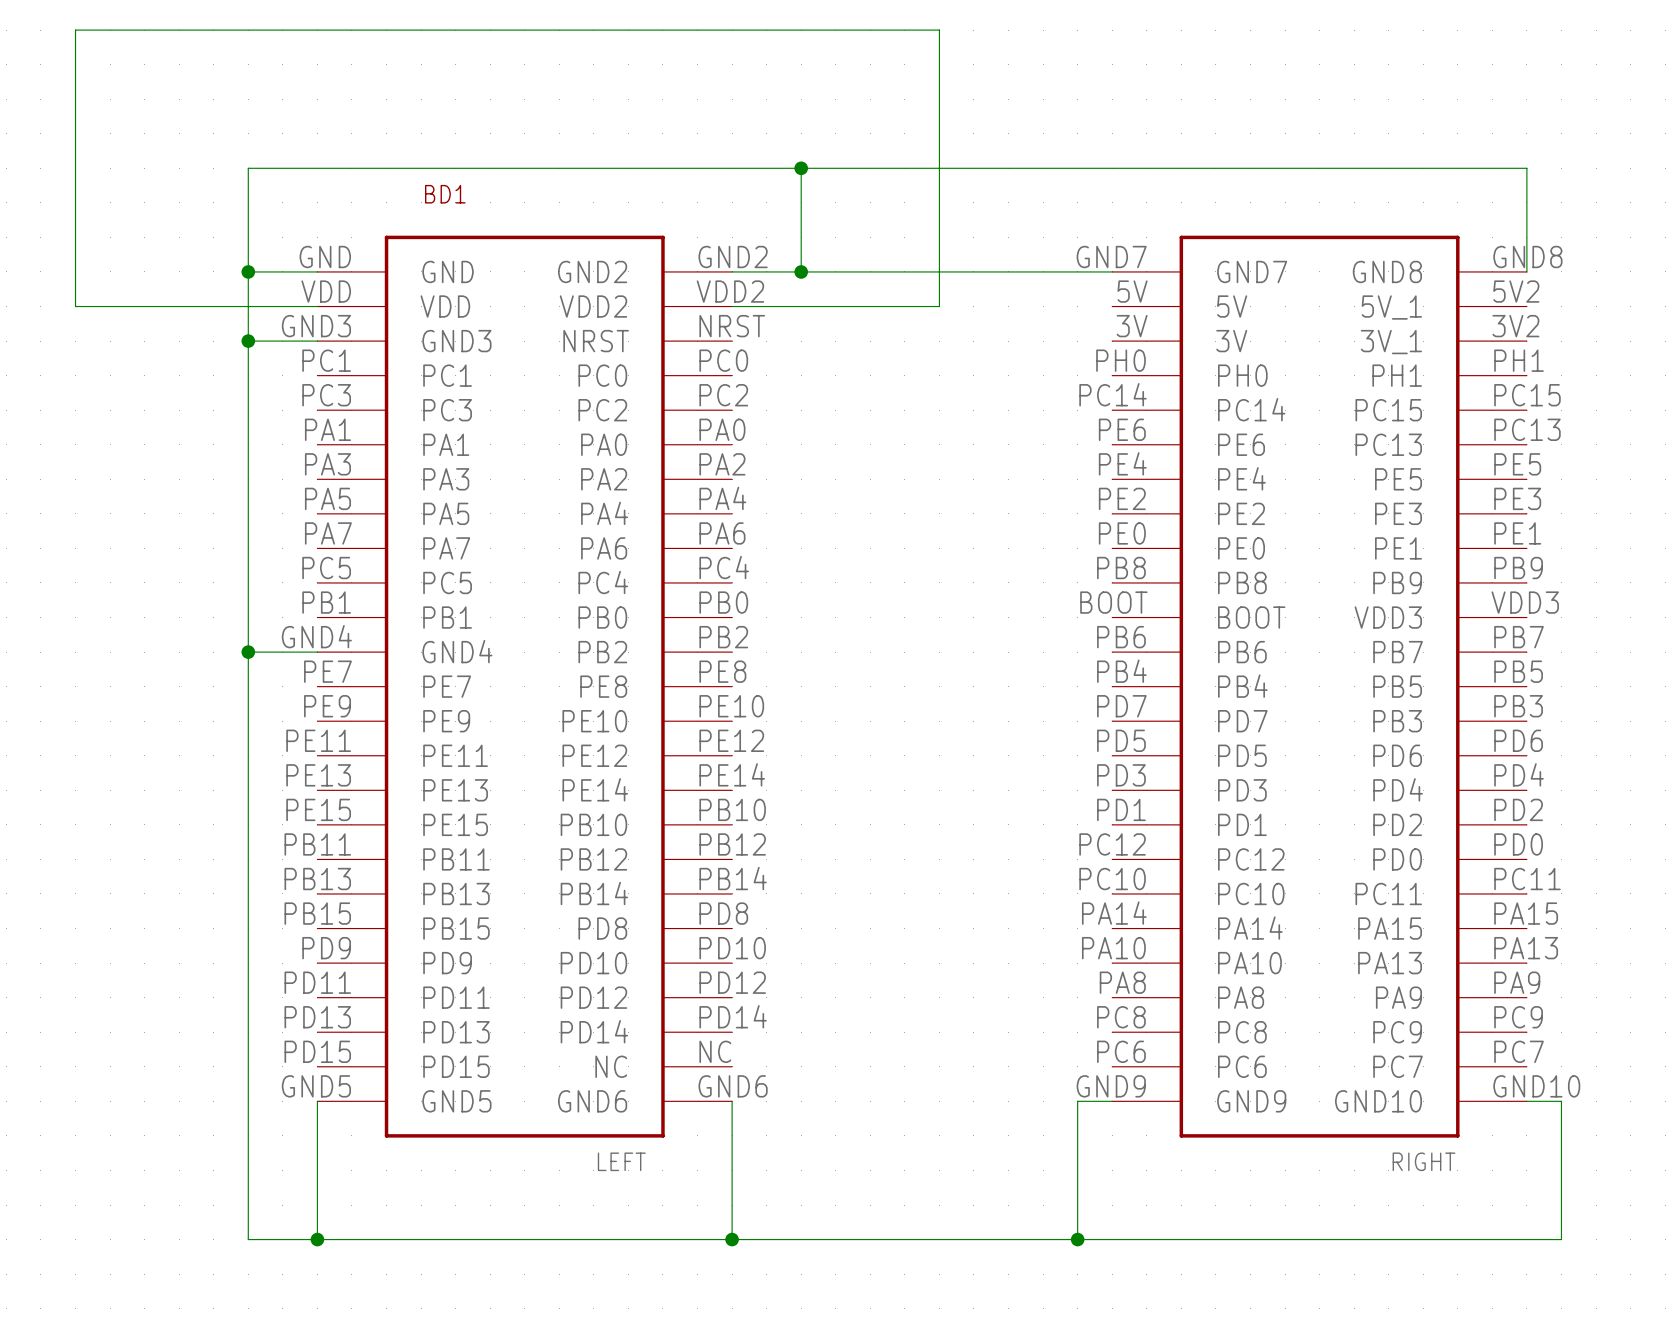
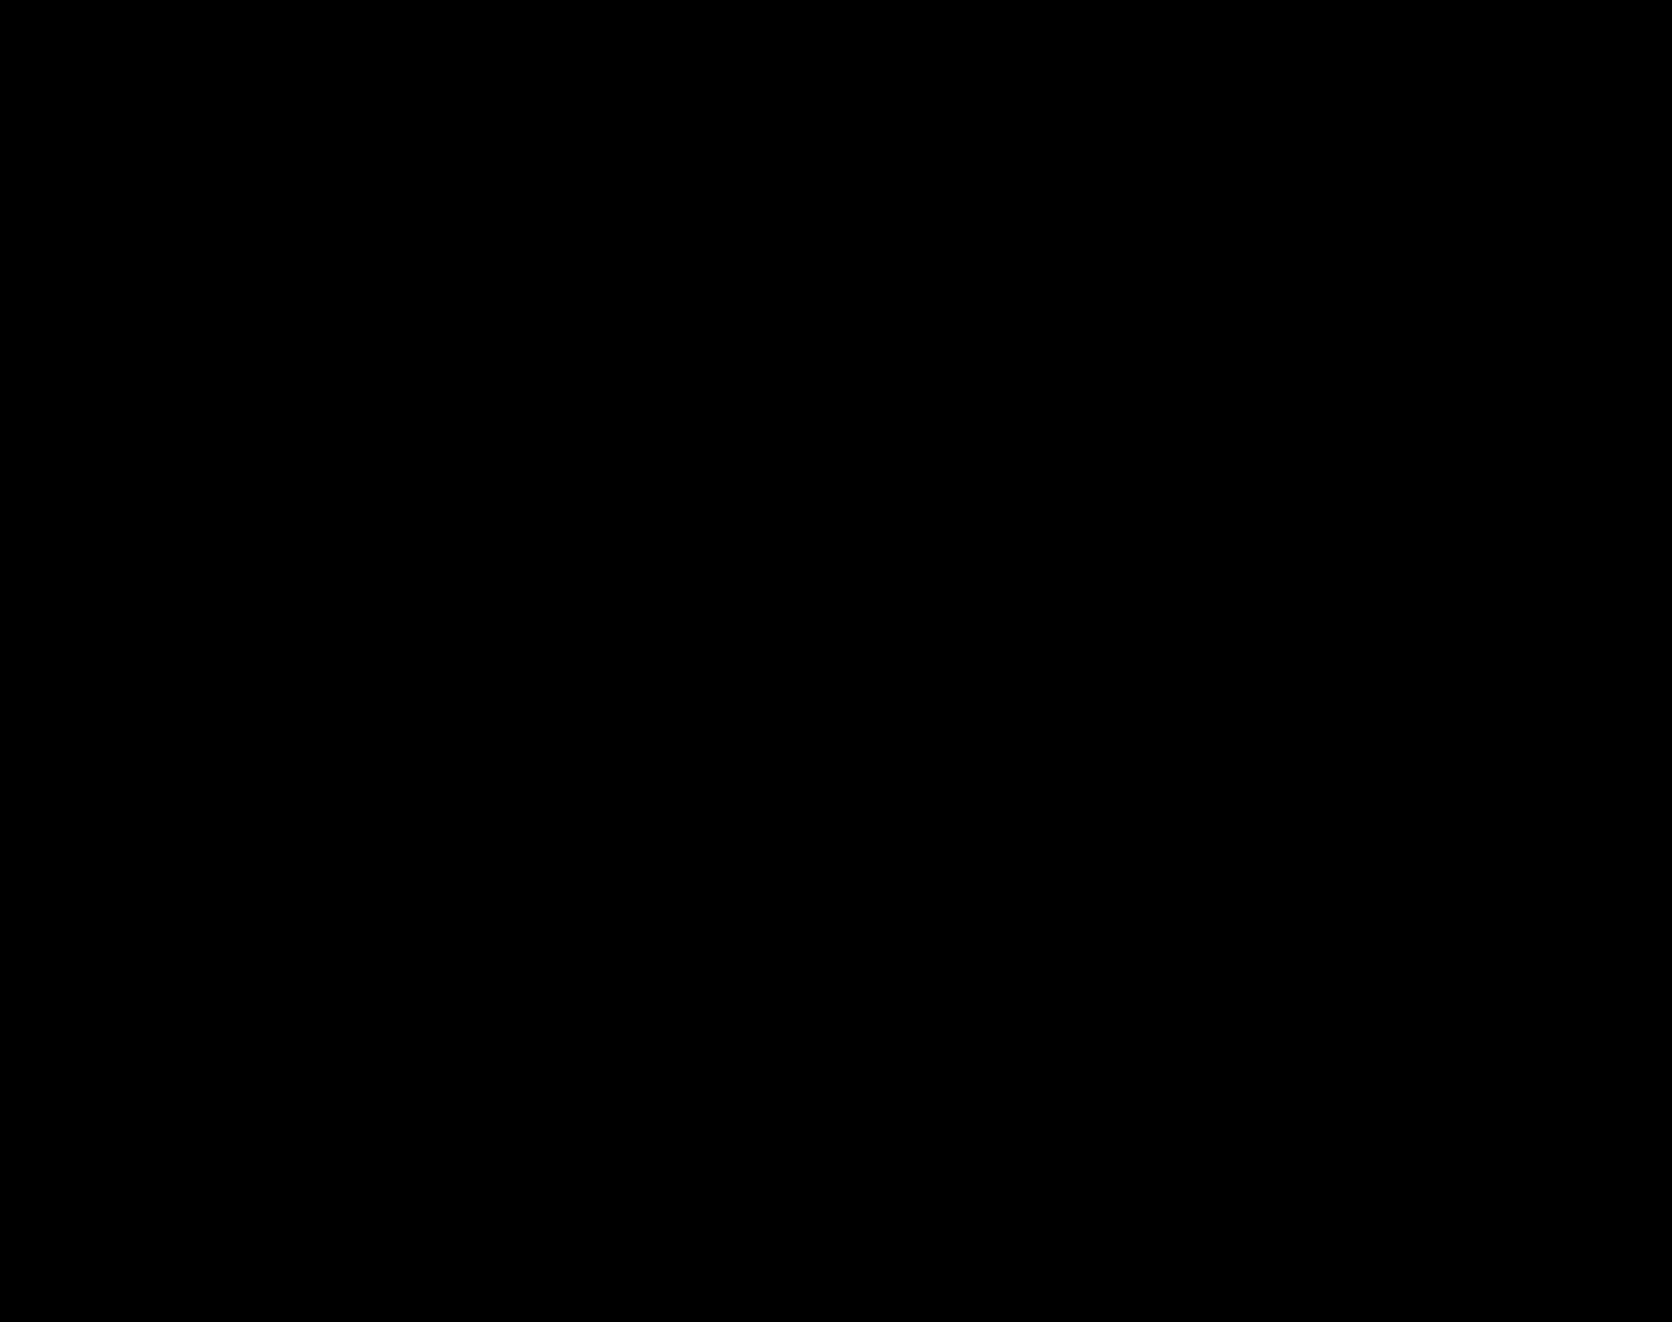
wire: (801, 168) (801, 271) -> none
junction: (801, 168) -> none
wire: (248, 271) (317, 271) -> none
junction: (248, 271) -> none
wire: (732, 271) (1112, 271) -> none
junction: (801, 271) -> none
wire: (1526, 271) (1526, 168) (248, 168) (248, 1239) (1561, 1239) (1561, 1101) (1526, 1101) -> none
wire: (317, 306) (75, 306) (75, 30) (939, 30) (939, 306) (732, 306) -> none
wire: (248, 341) (317, 341) -> none
junction: (248, 341) -> none
wire: (248, 652) (317, 652) -> none
junction: (248, 652) -> none
BD1: (922, 686) -> none
wire: (317, 1101) (317, 1239) -> none
wire: (732, 1101) (732, 1239) -> none
wire: (1112, 1101) (1077, 1101) (1077, 1239) -> none
junction: (317, 1239) -> none
junction: (732, 1239) -> none
junction: (1077, 1239) -> none

